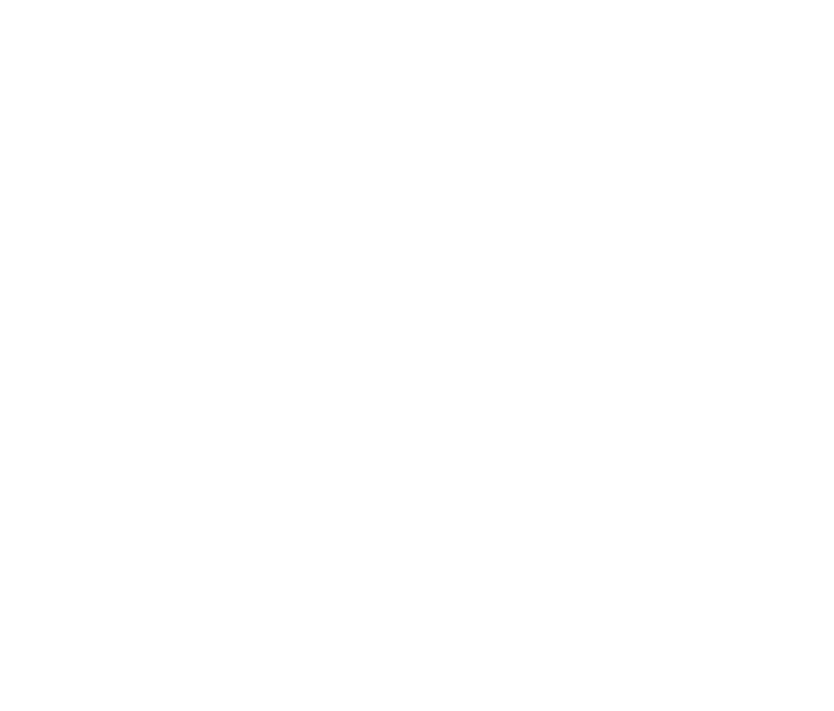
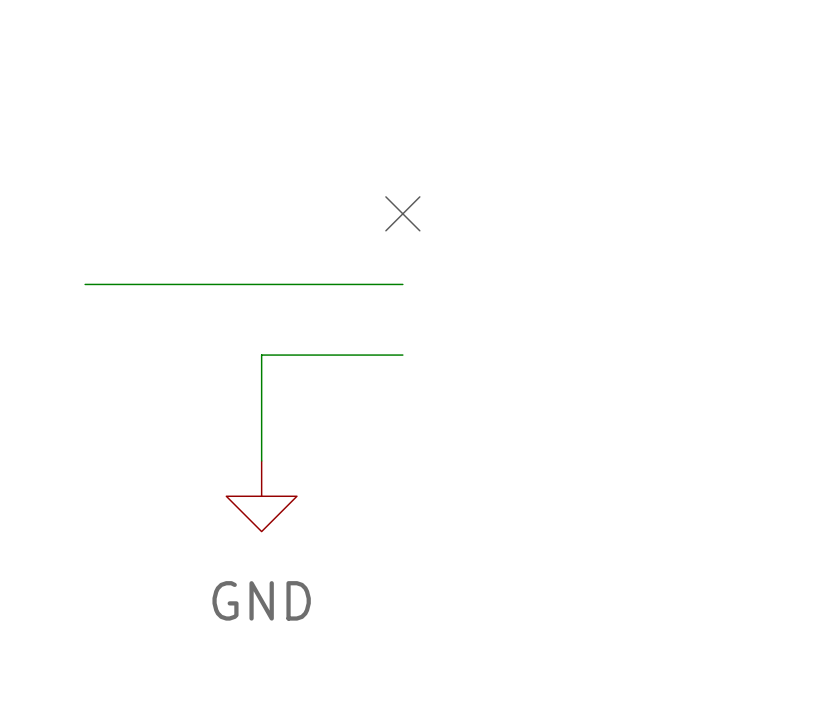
no-connect mark: none -> (402, 213)
wire: none -> (85, 284) (402, 284)
wire: none -> (402, 355) (261, 355) (261, 460)
power symbol: none -> GND (261, 496)

